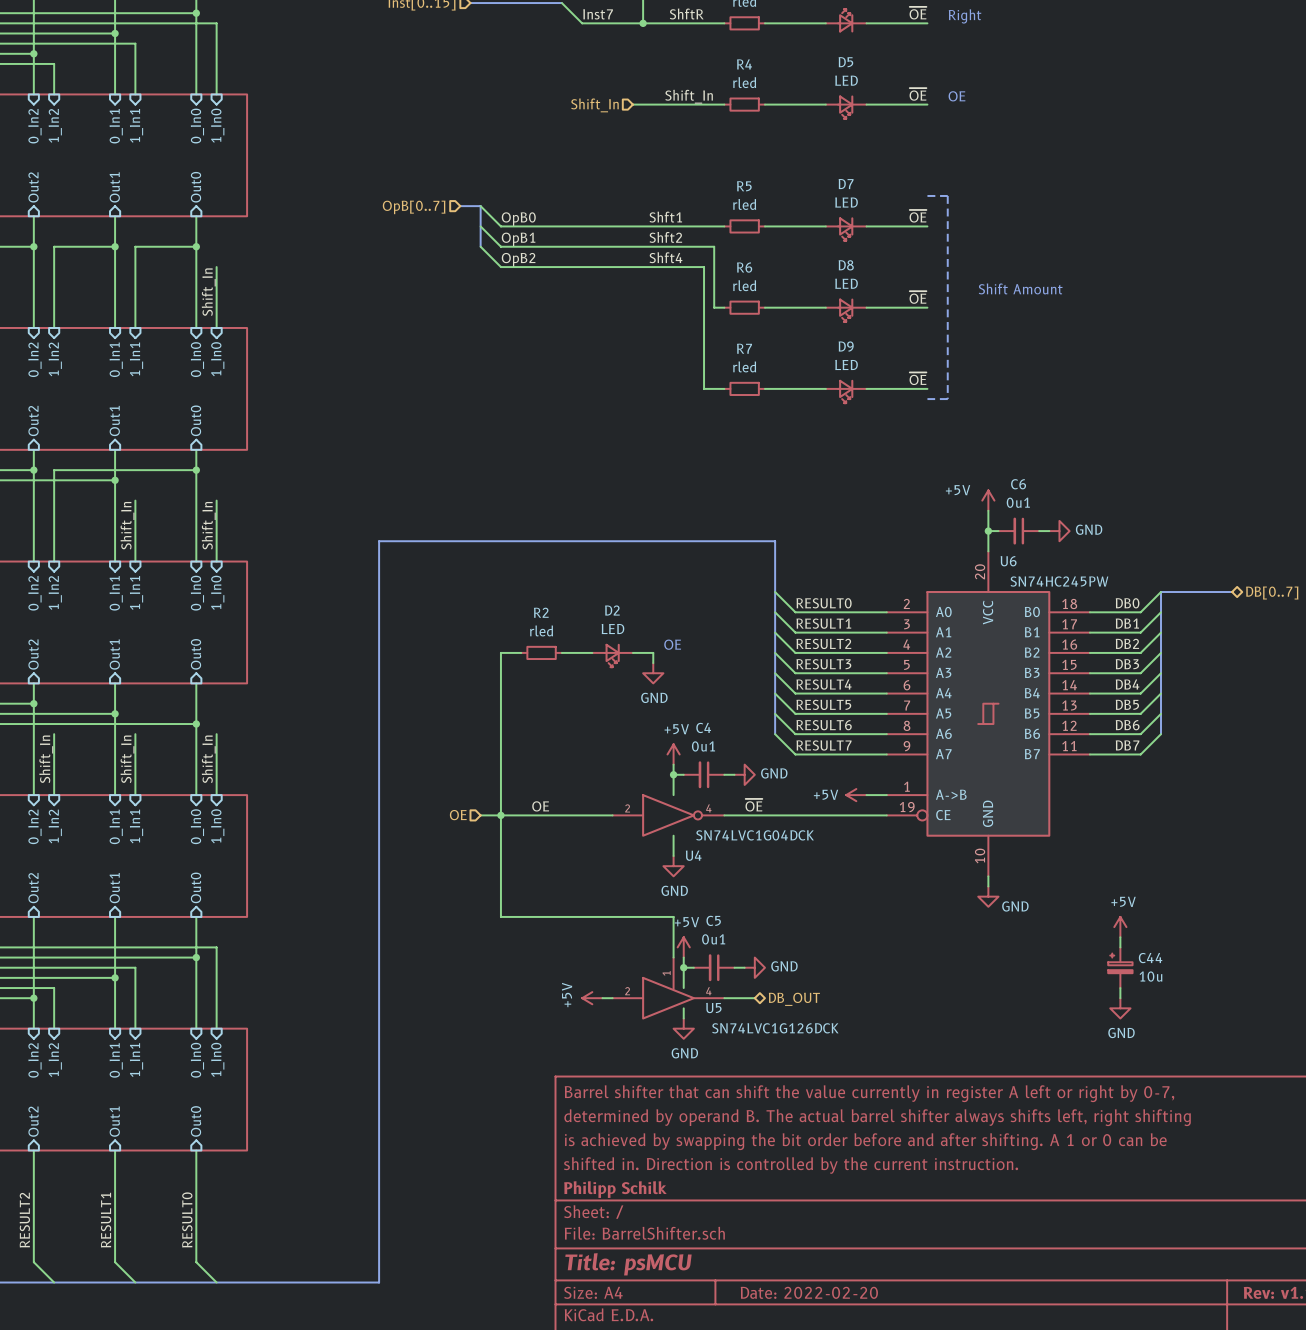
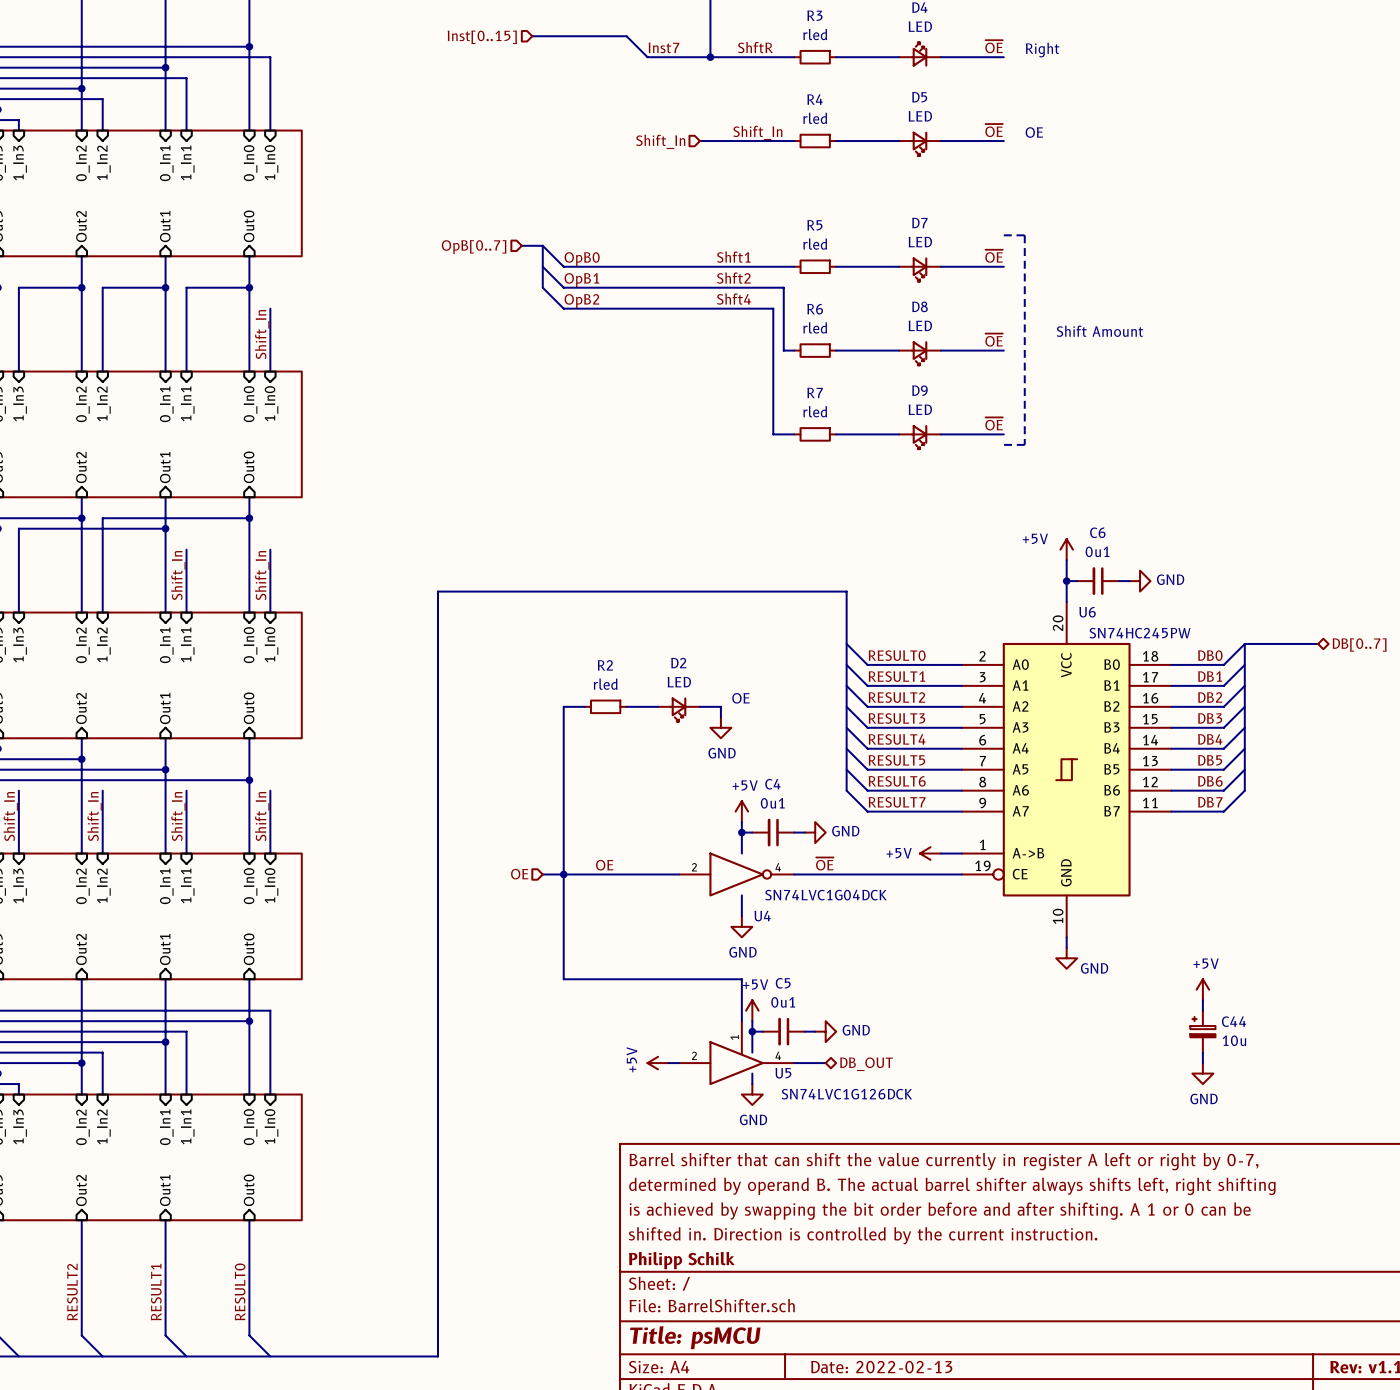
title block: Date: 2022-02-20 (809, 1292) -> Date: 2022-02-13 (881, 1367)

